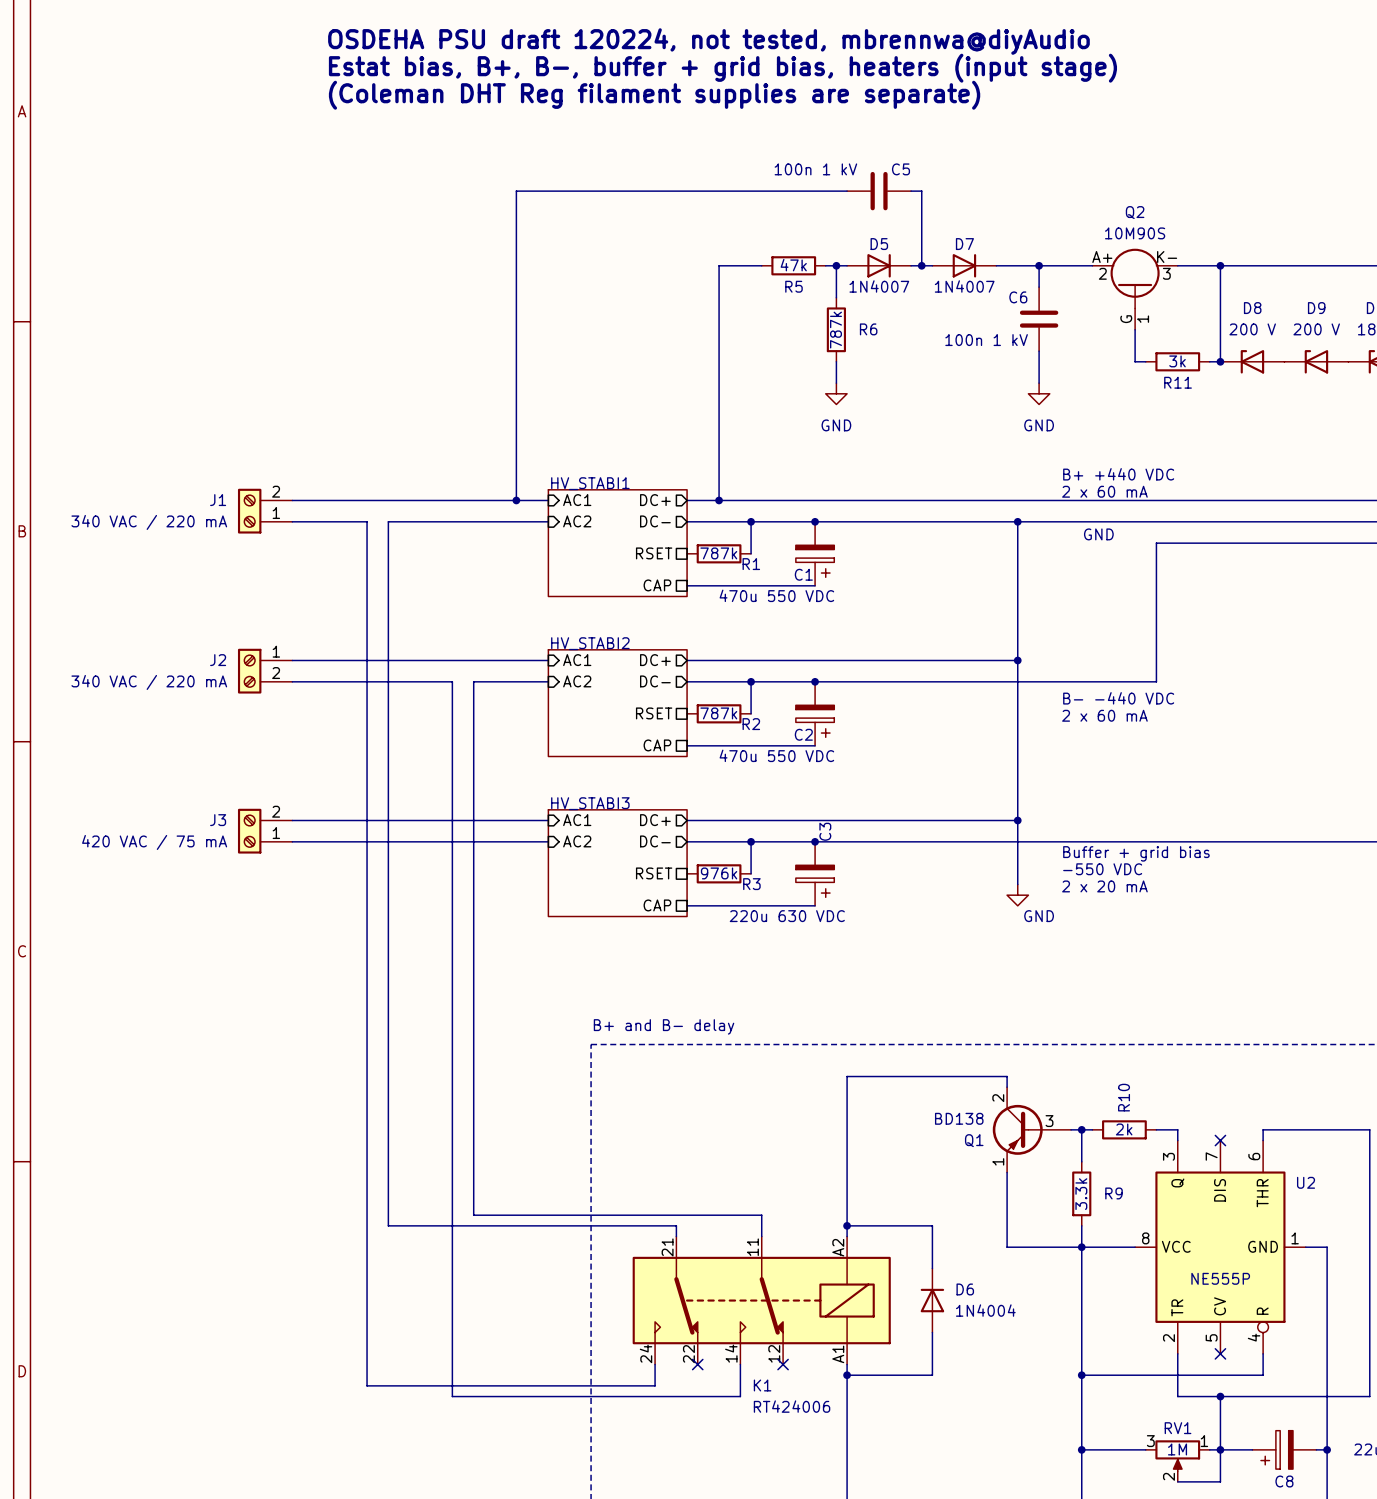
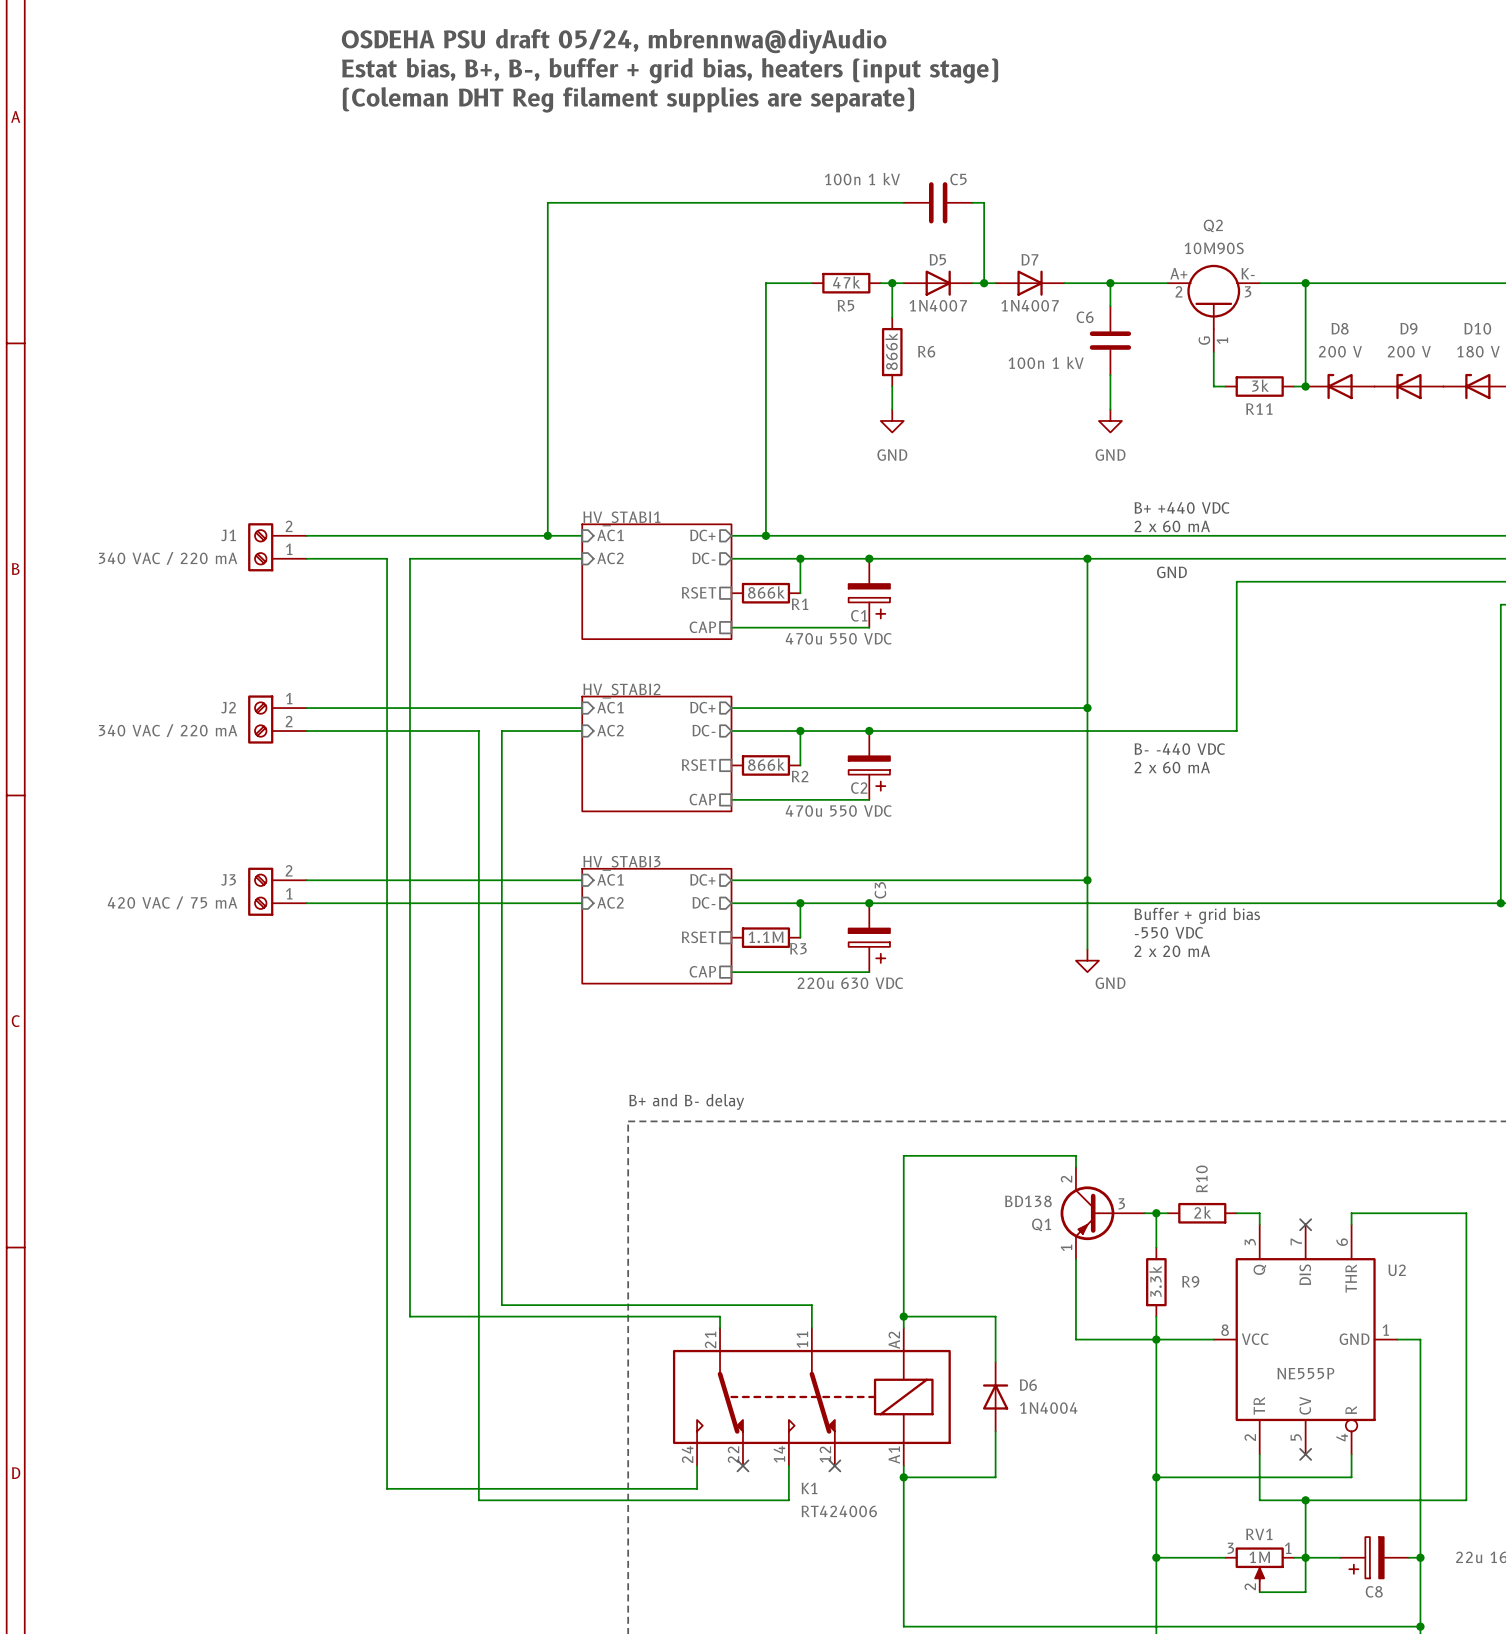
text: OSDEHA PSU draft 120224, not tested, mbrennwa@diyAudio (708, 41) -> OSDEHA PSU draft 05/24, mbrennwa@diyAudio (614, 41)
R6 value: 787k (836, 330) -> 866k (891, 351)
R1 value: 787k (718, 553) -> 866k (766, 592)
R2 value: 787k (718, 713) -> 866k (766, 764)
R3 value: 976k (719, 873) -> 1.1M (765, 937)

